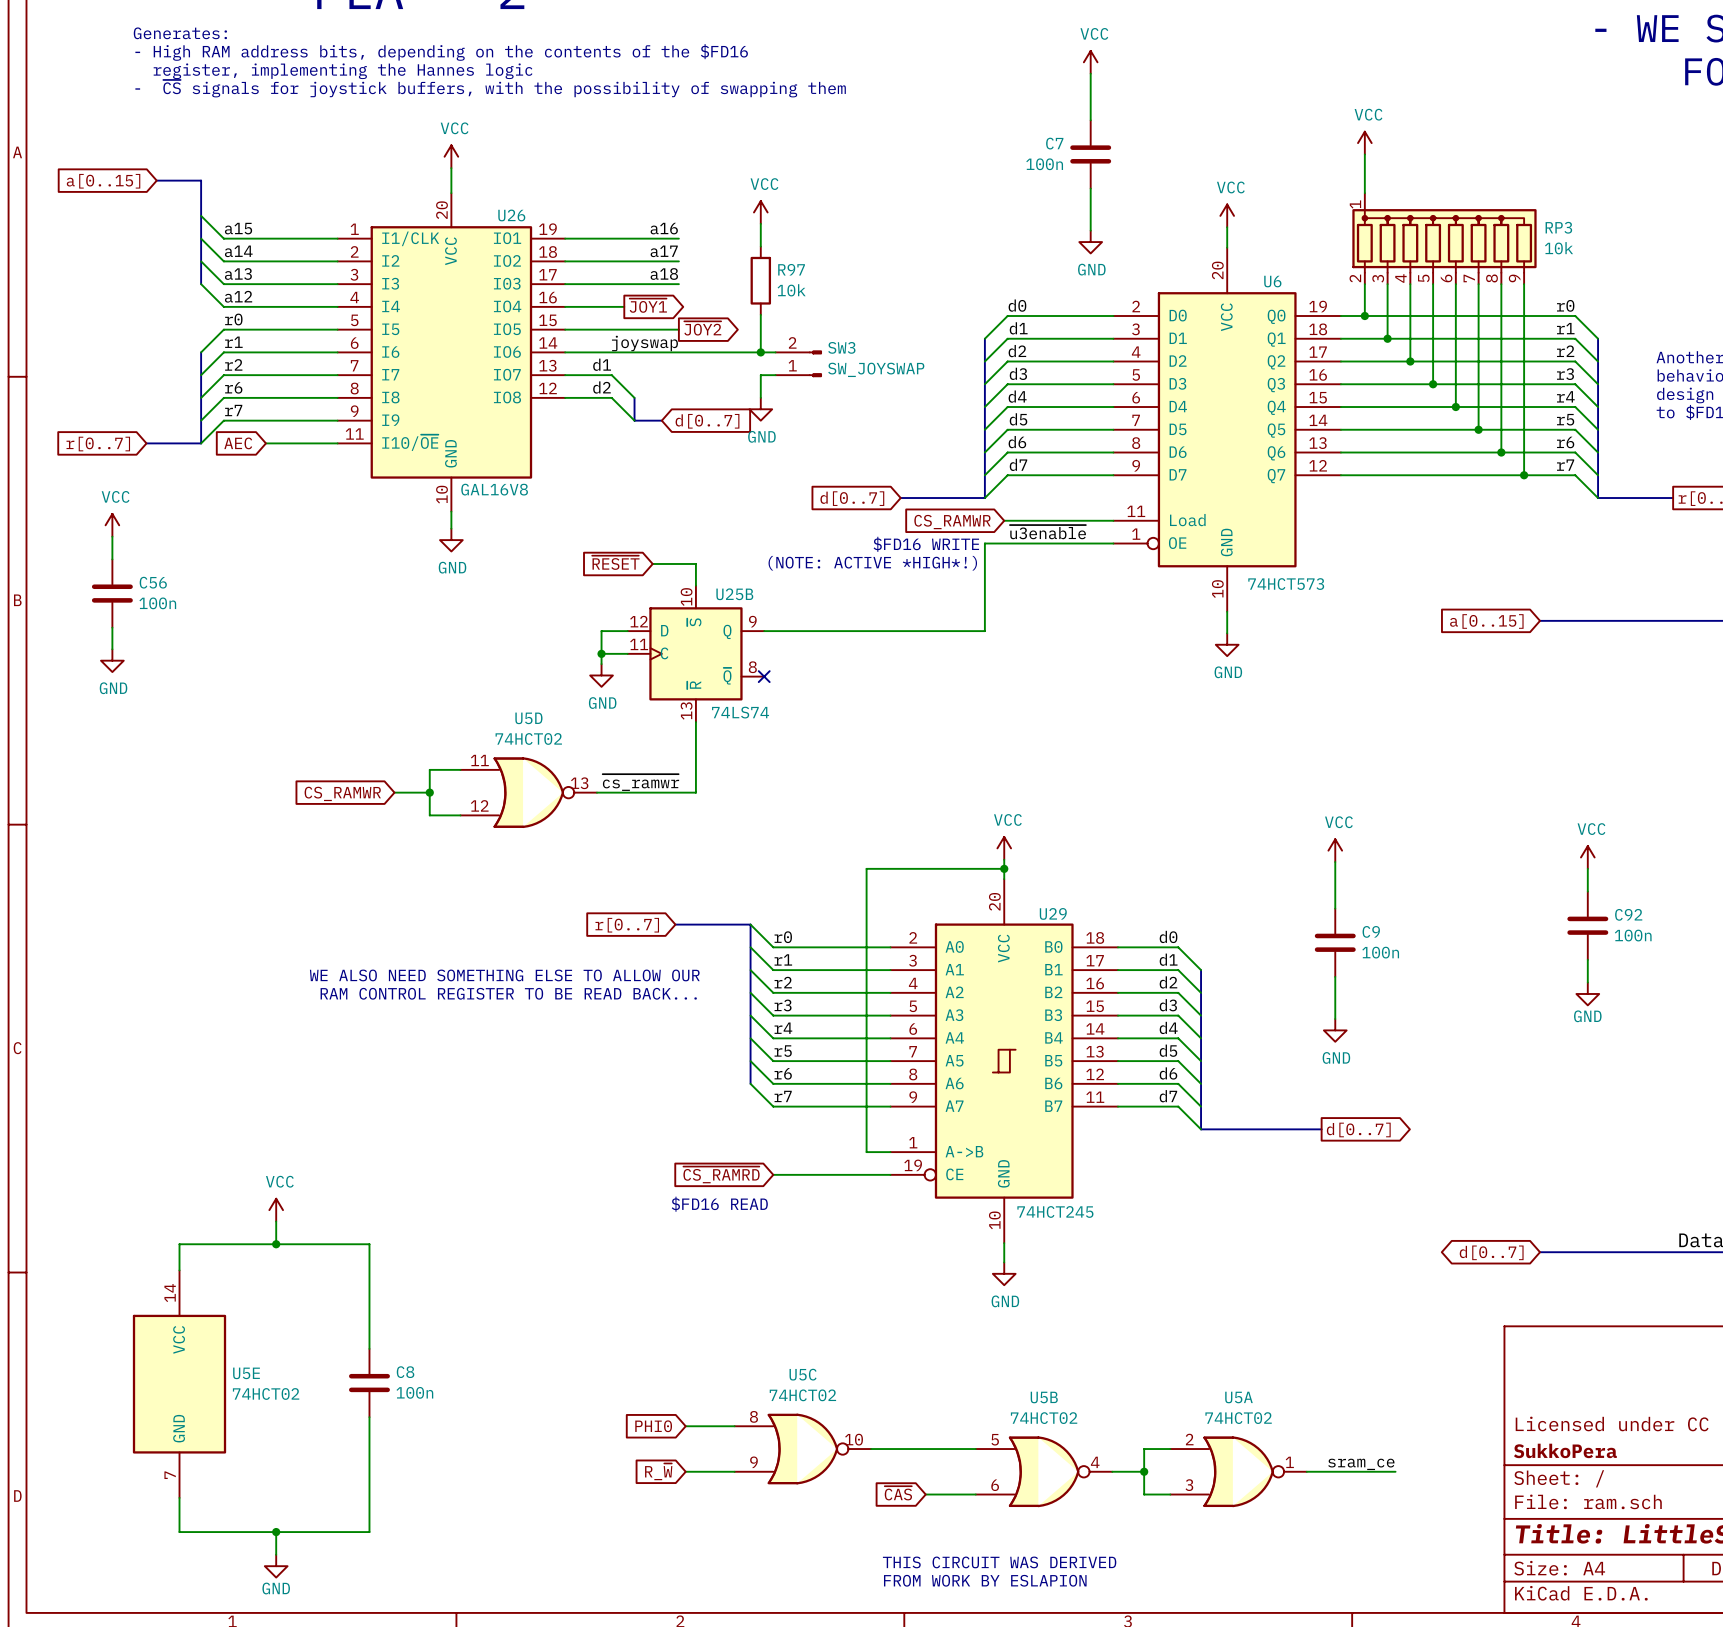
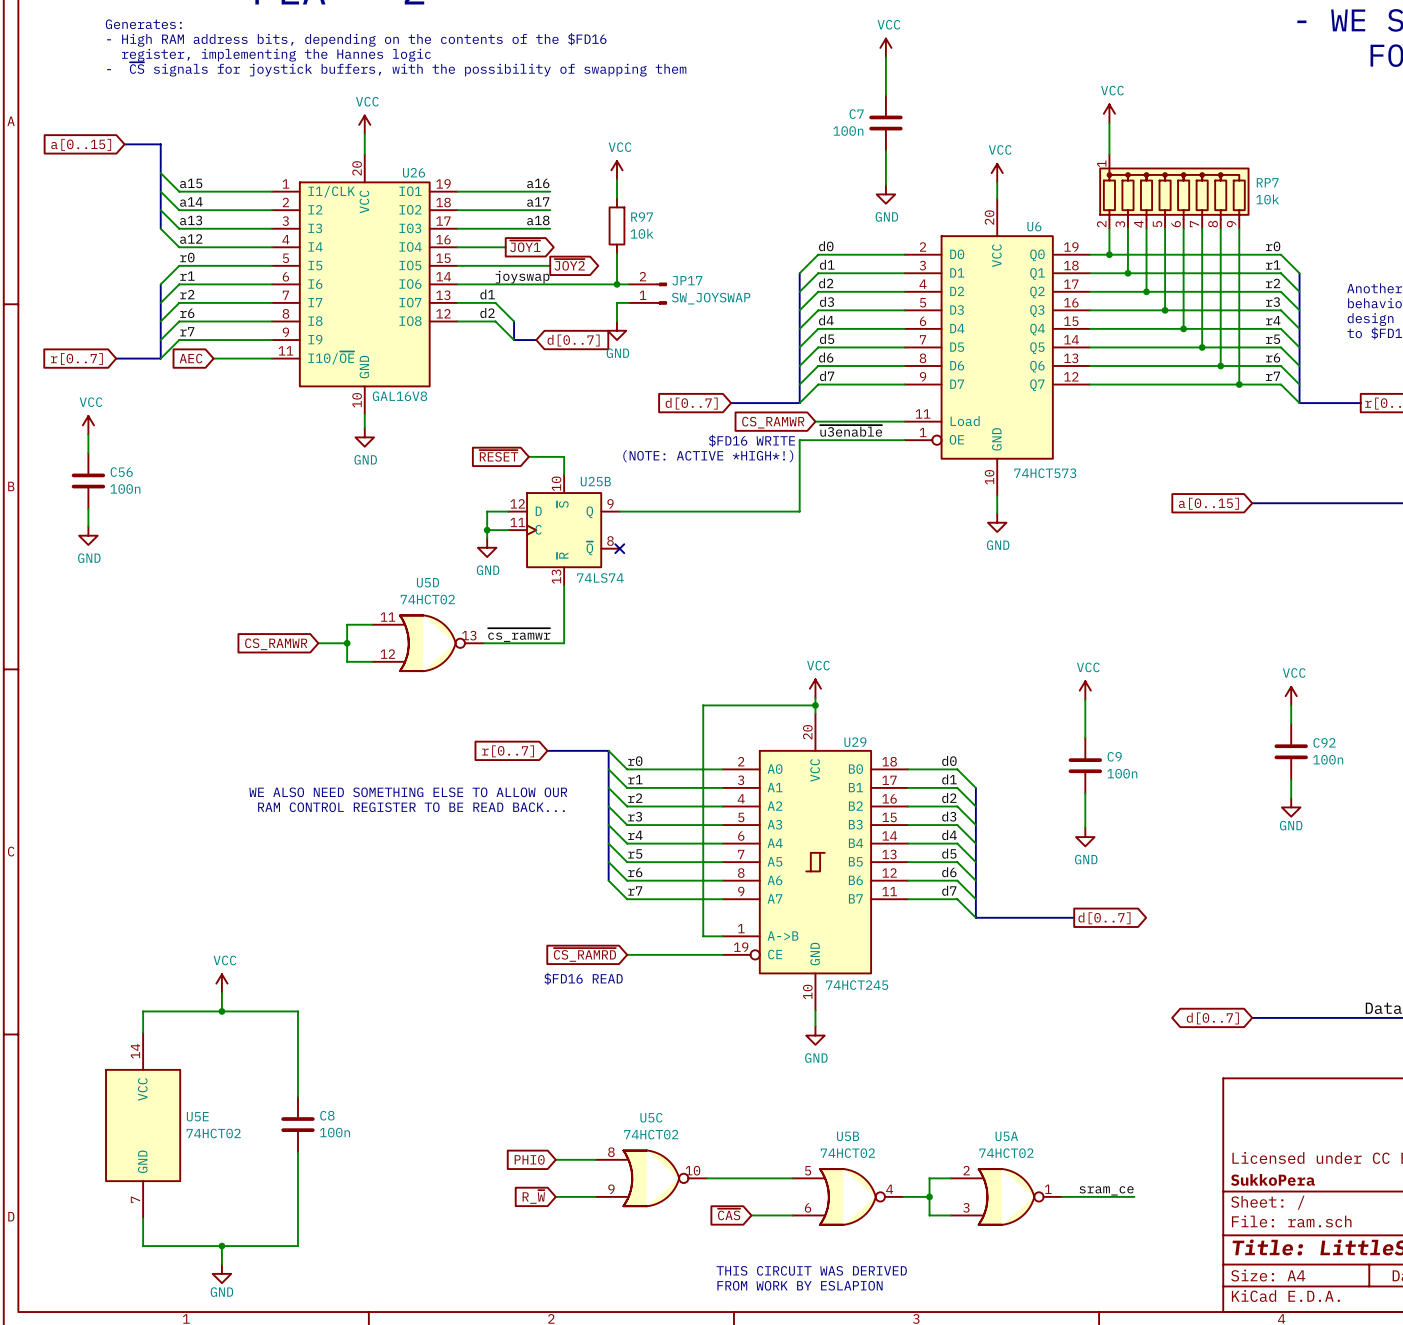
RP3 name: RP3 (1558, 227) -> RP7 (1267, 182)
SW3 name: SW3 (841, 347) -> JP17 (687, 280)

